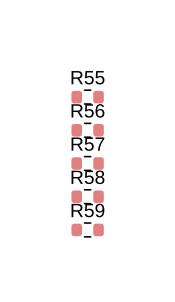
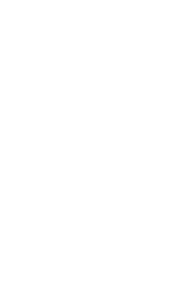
R55: (87, 97) -> none
R56: (87, 130) -> none
R57: (87, 163) -> none
R58: (87, 196) -> none
R59: (87, 229) -> none

